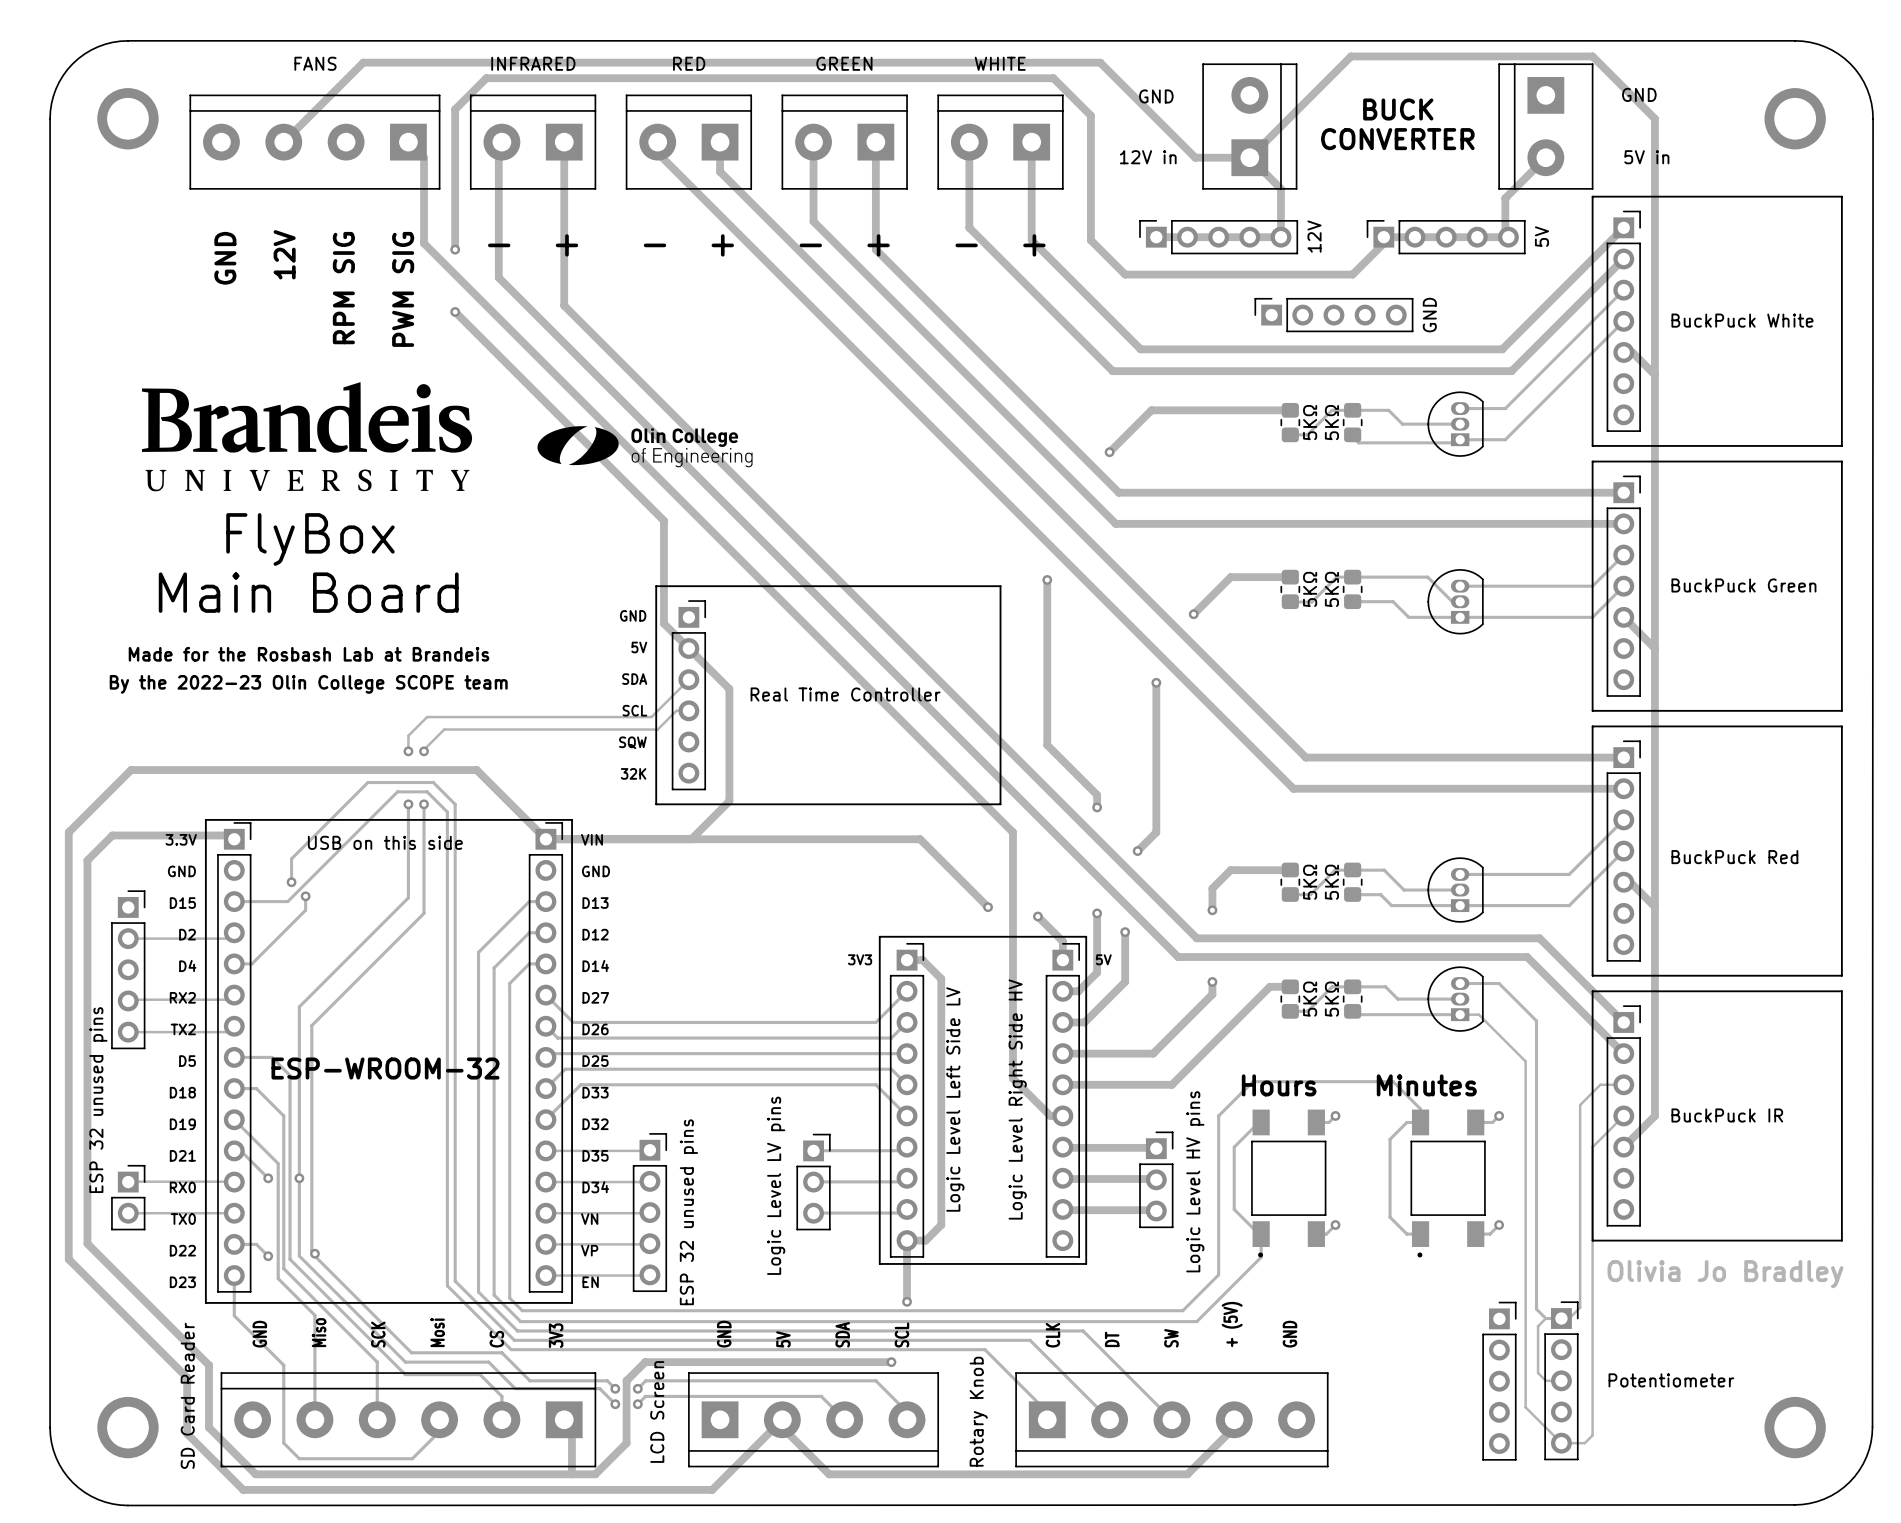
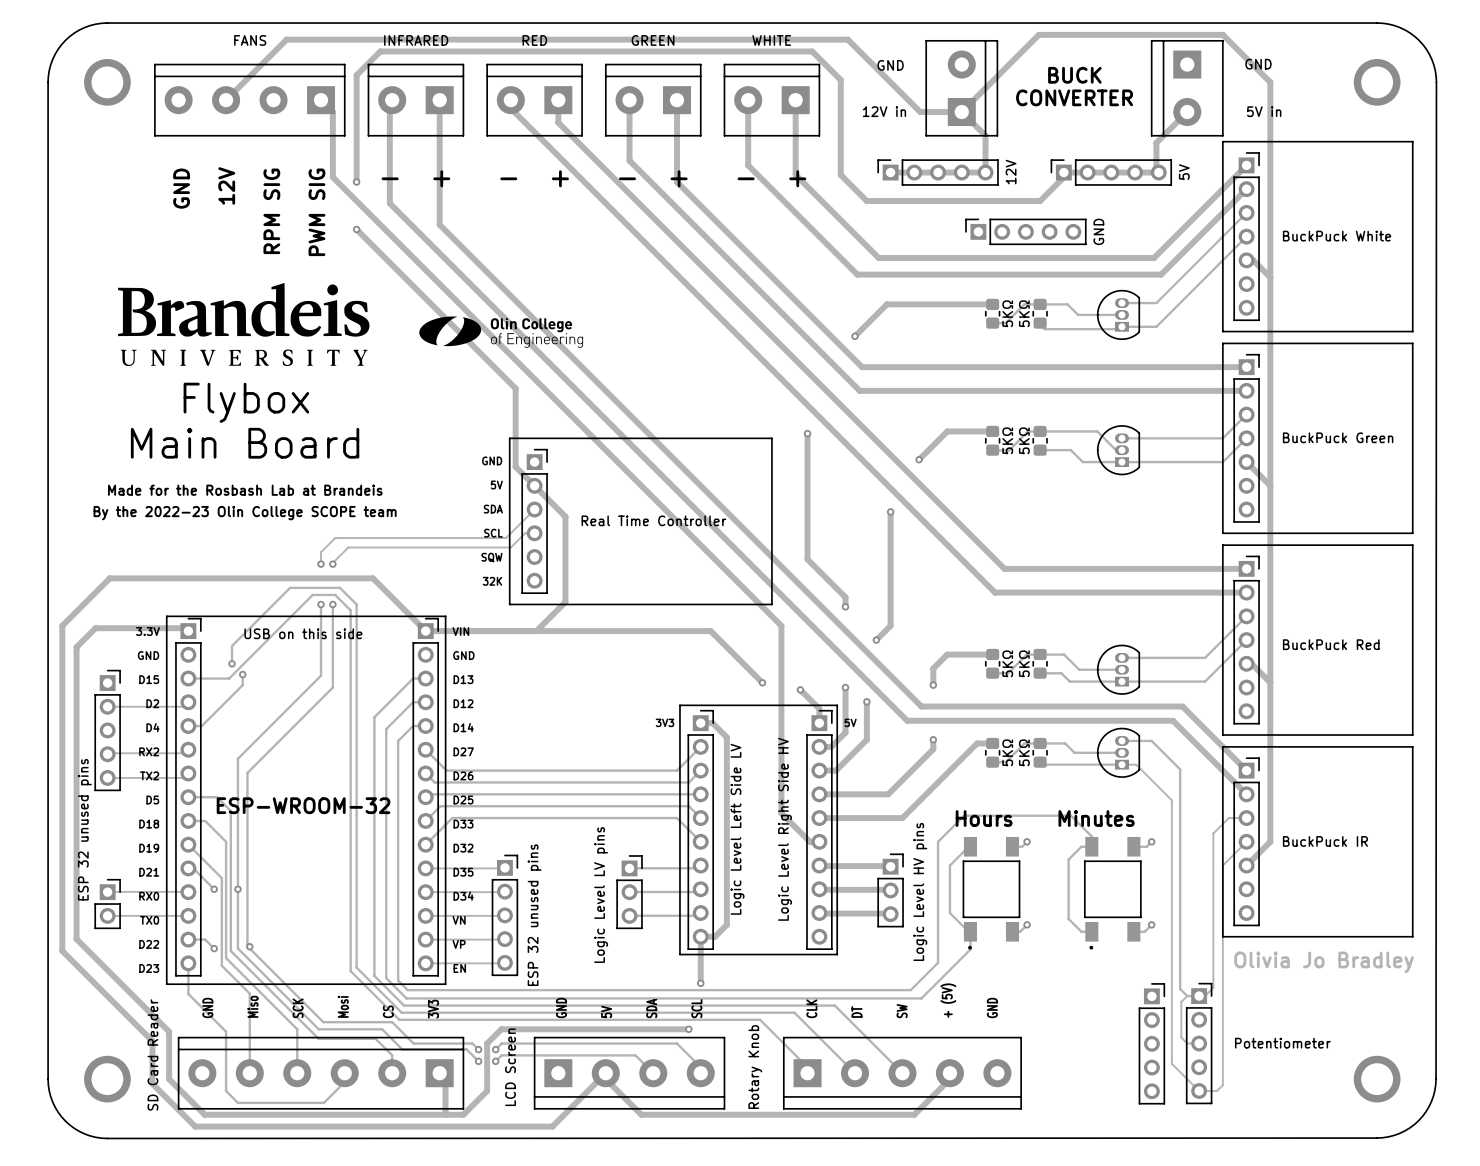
text: FlyBox (310, 539) -> Flybox (246, 402)

